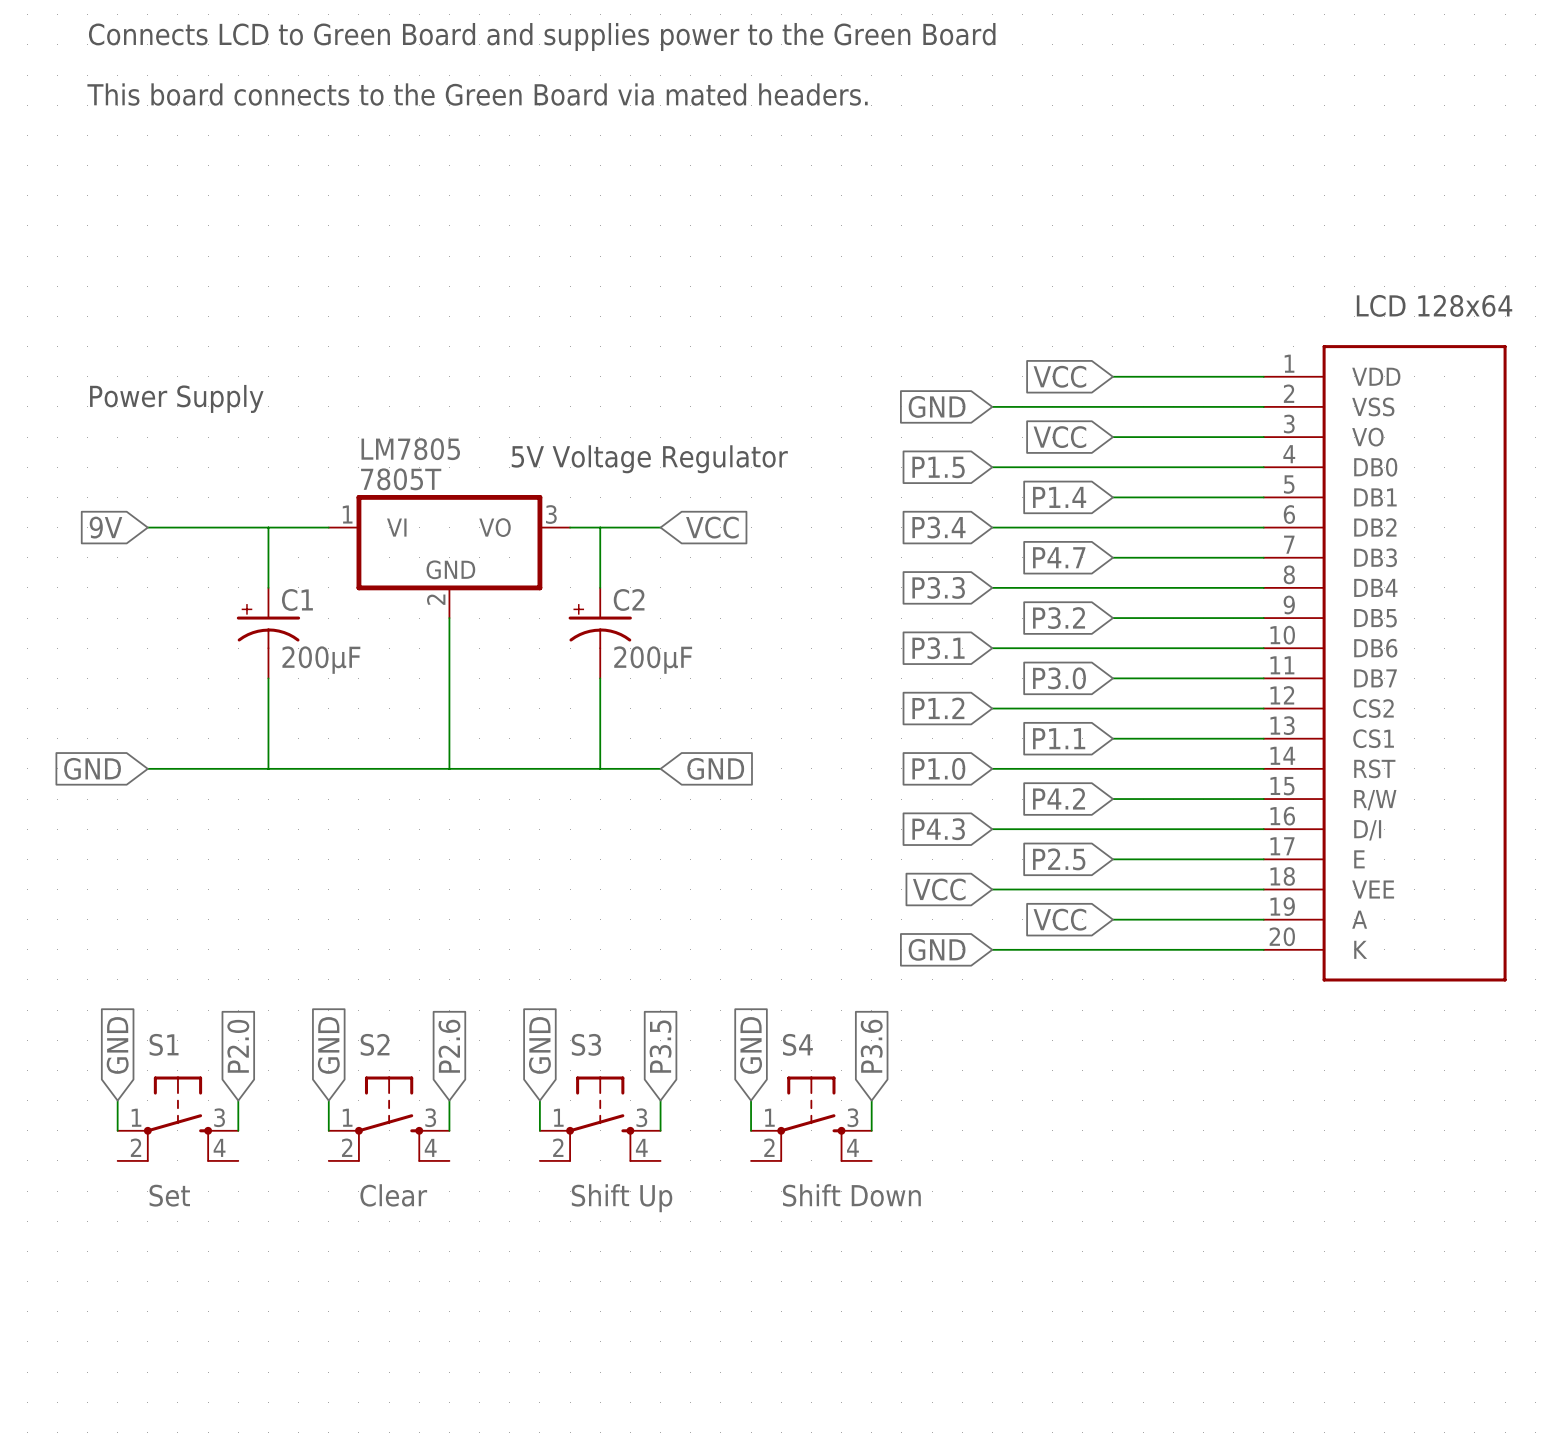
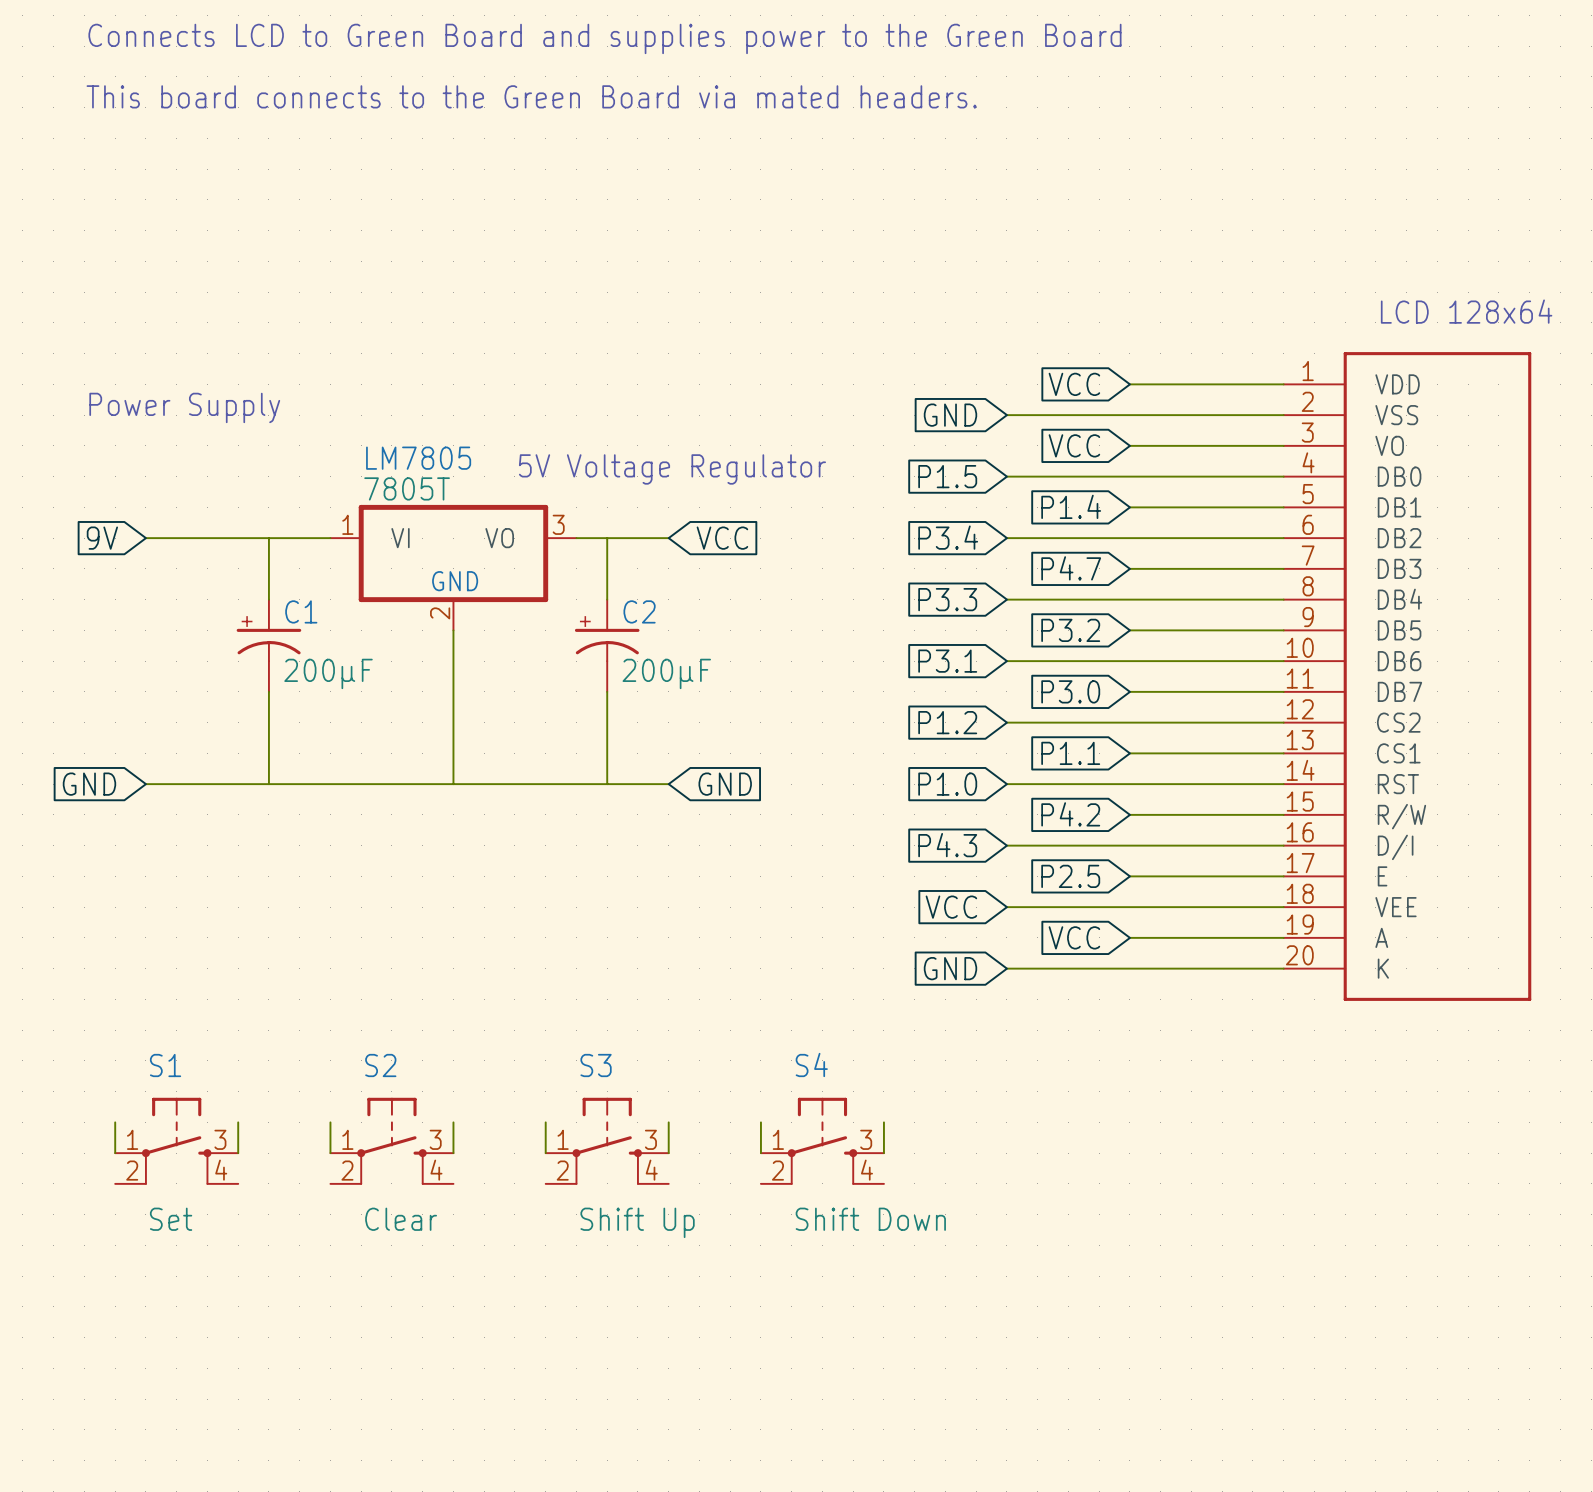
global label: GND (117, 1045) -> none
global label: GND (328, 1045) -> none
global label: GND (539, 1045) -> none
global label: GND (751, 1045) -> none
global label: P2.0 (238, 1046) -> none
global label: P2.6 (449, 1046) -> none
global label: P3.5 (660, 1046) -> none
global label: P3.6 (871, 1046) -> none

